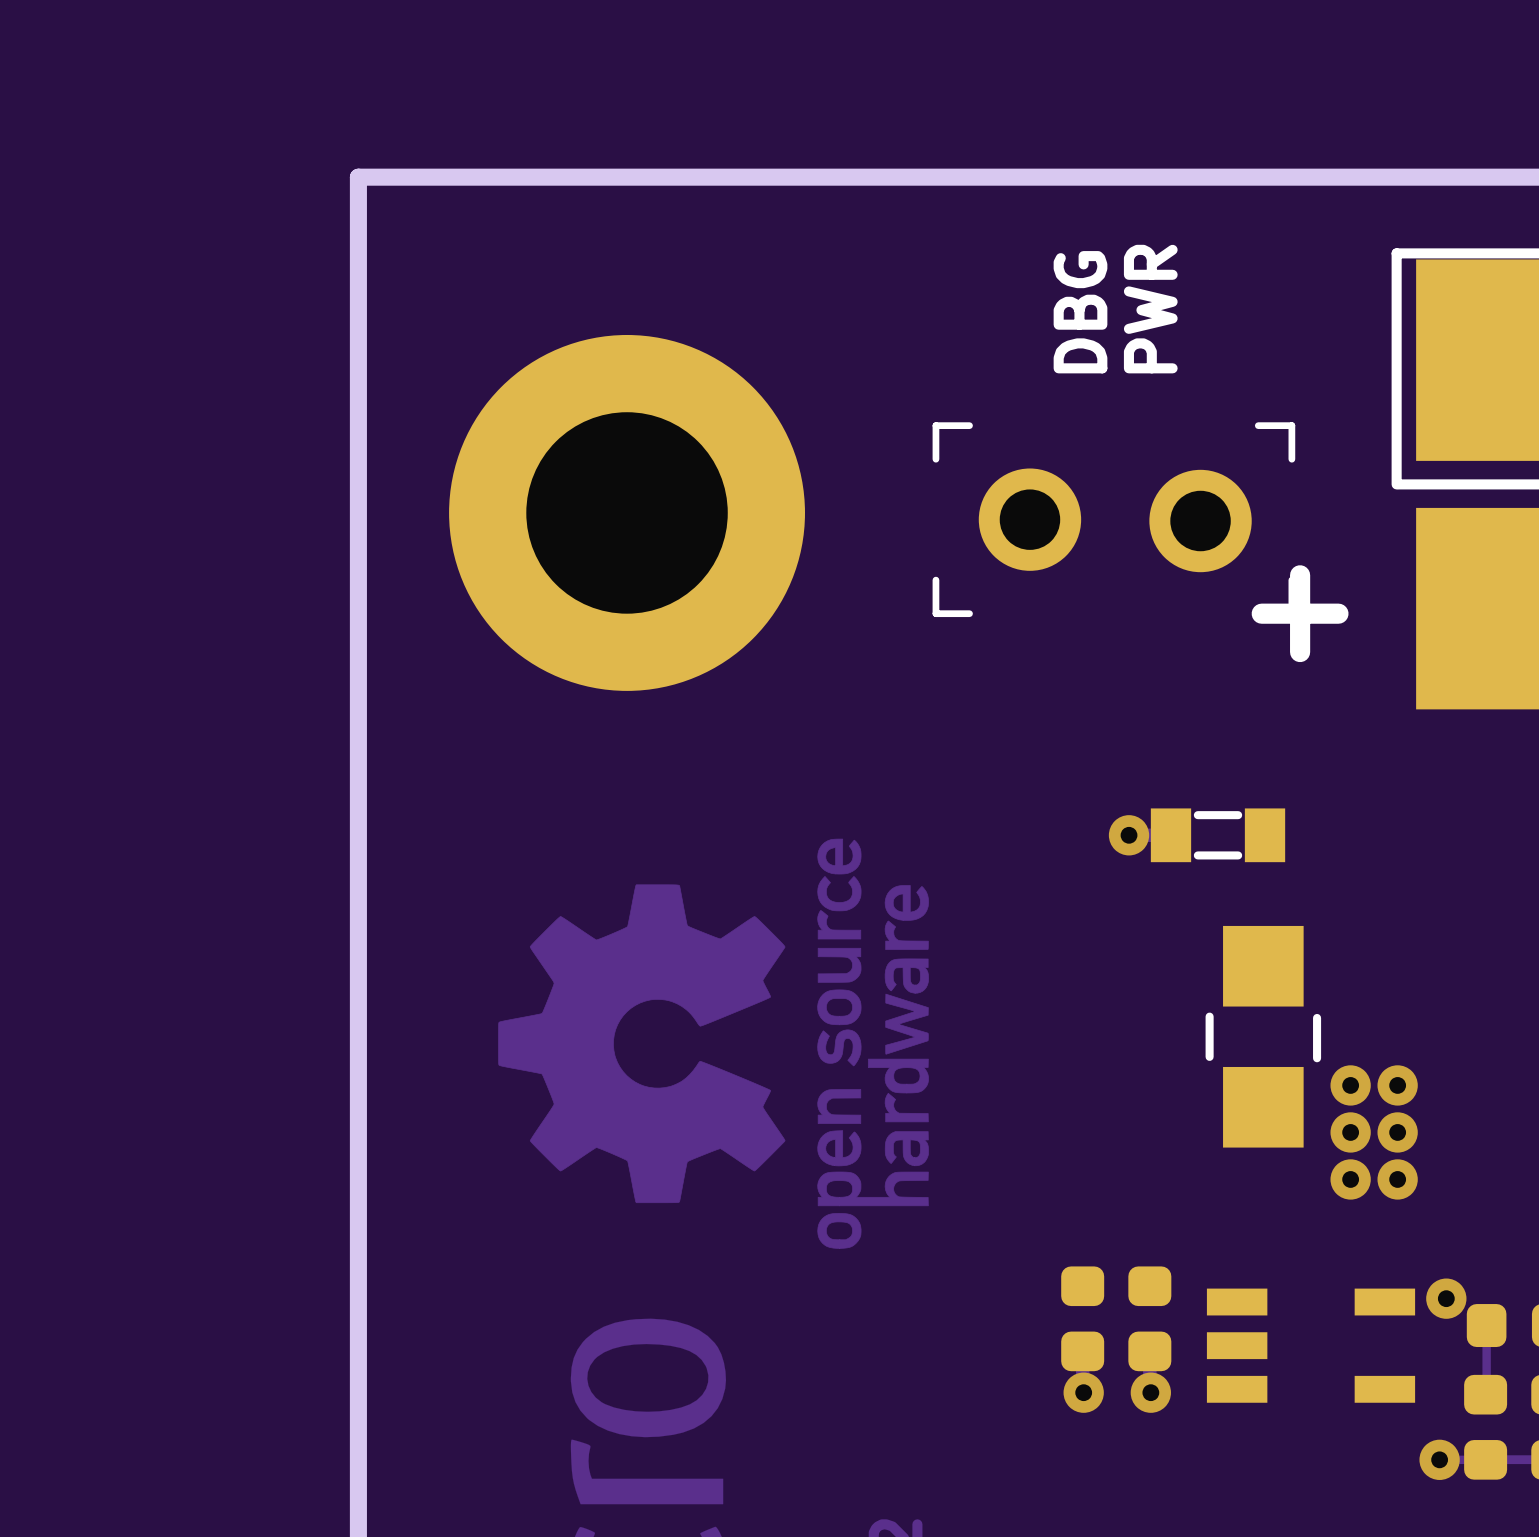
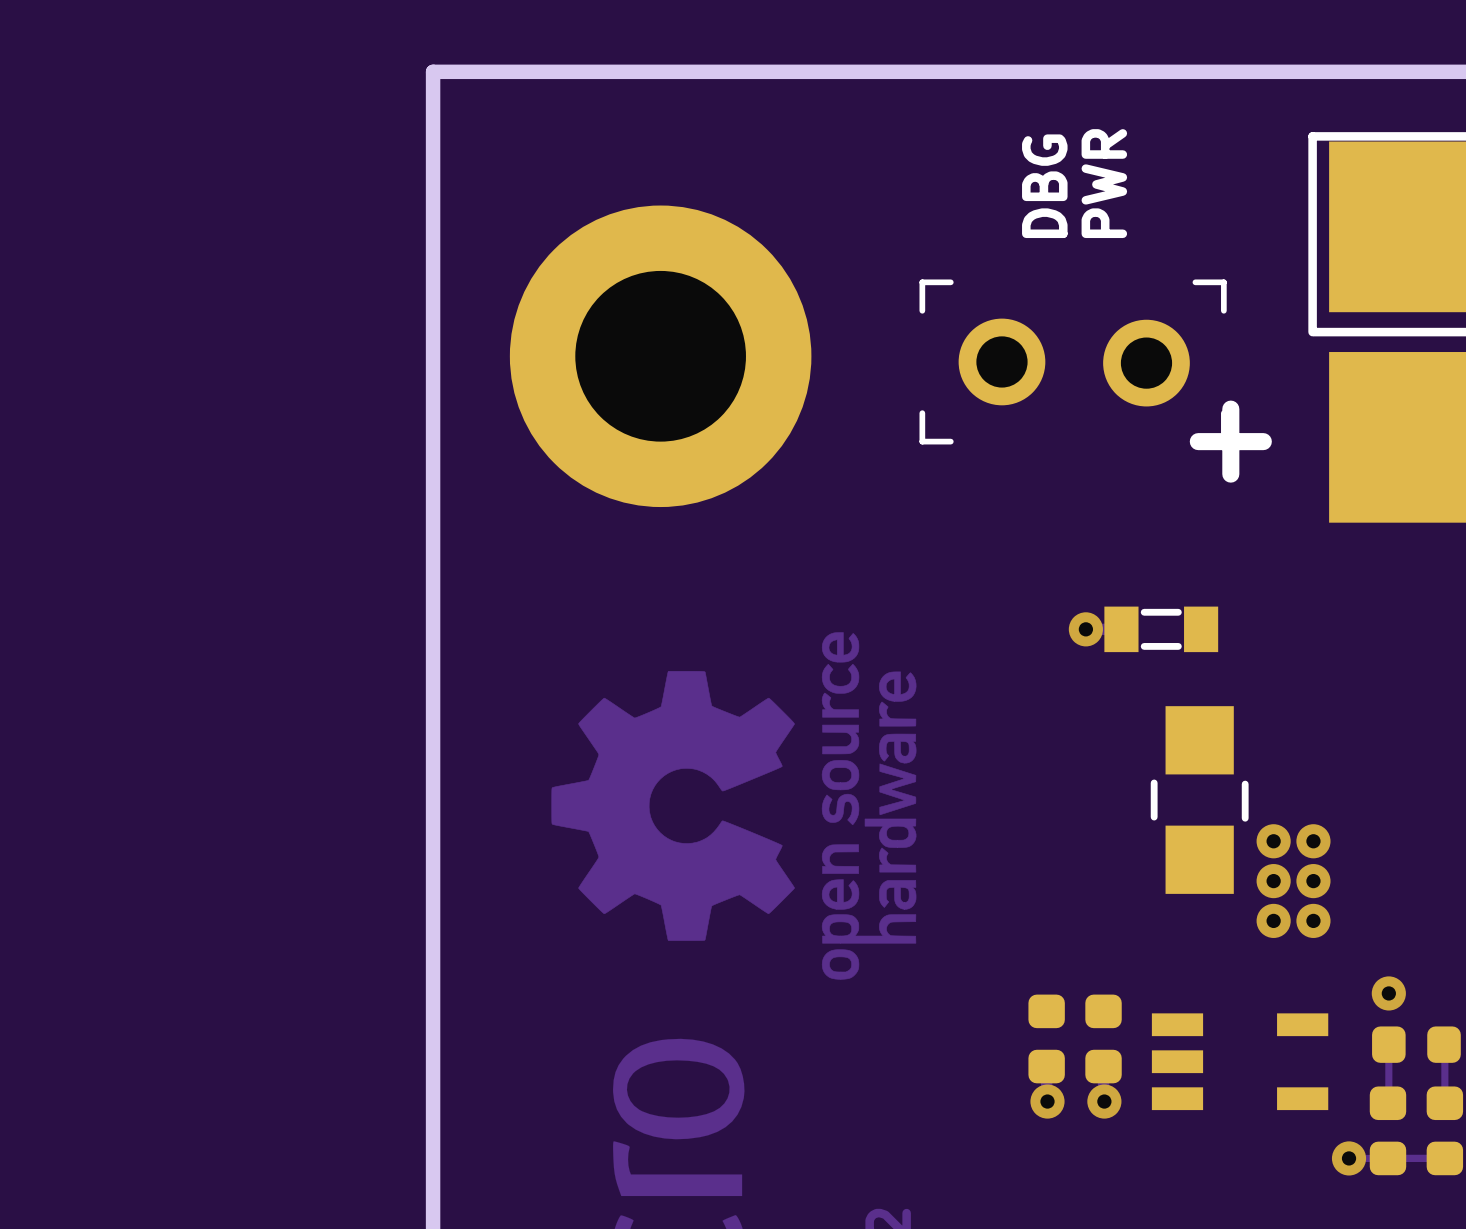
via position: (1446, 1298) -> (1388, 993)

